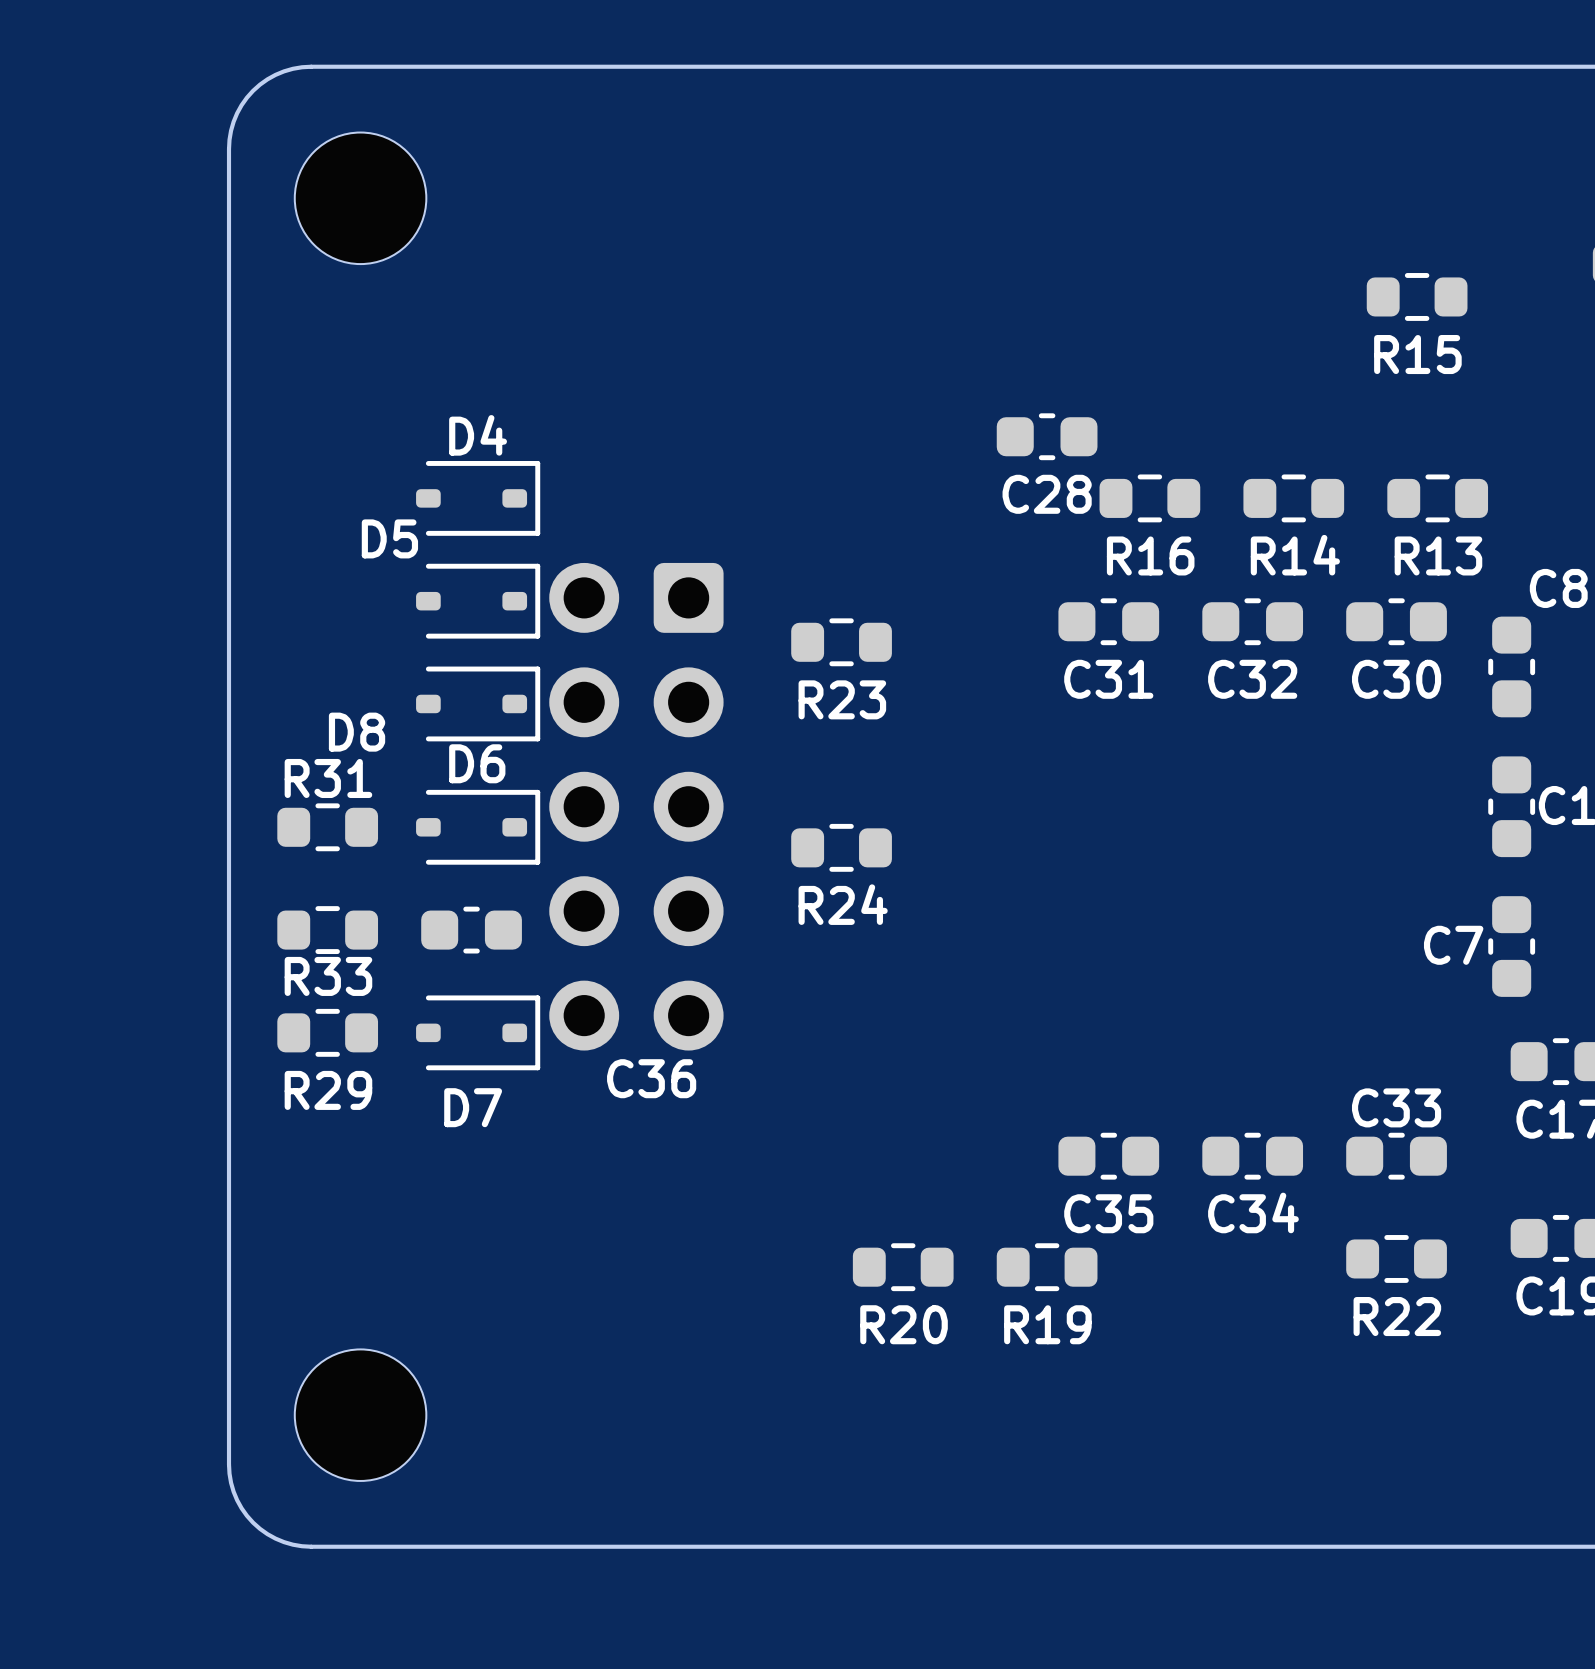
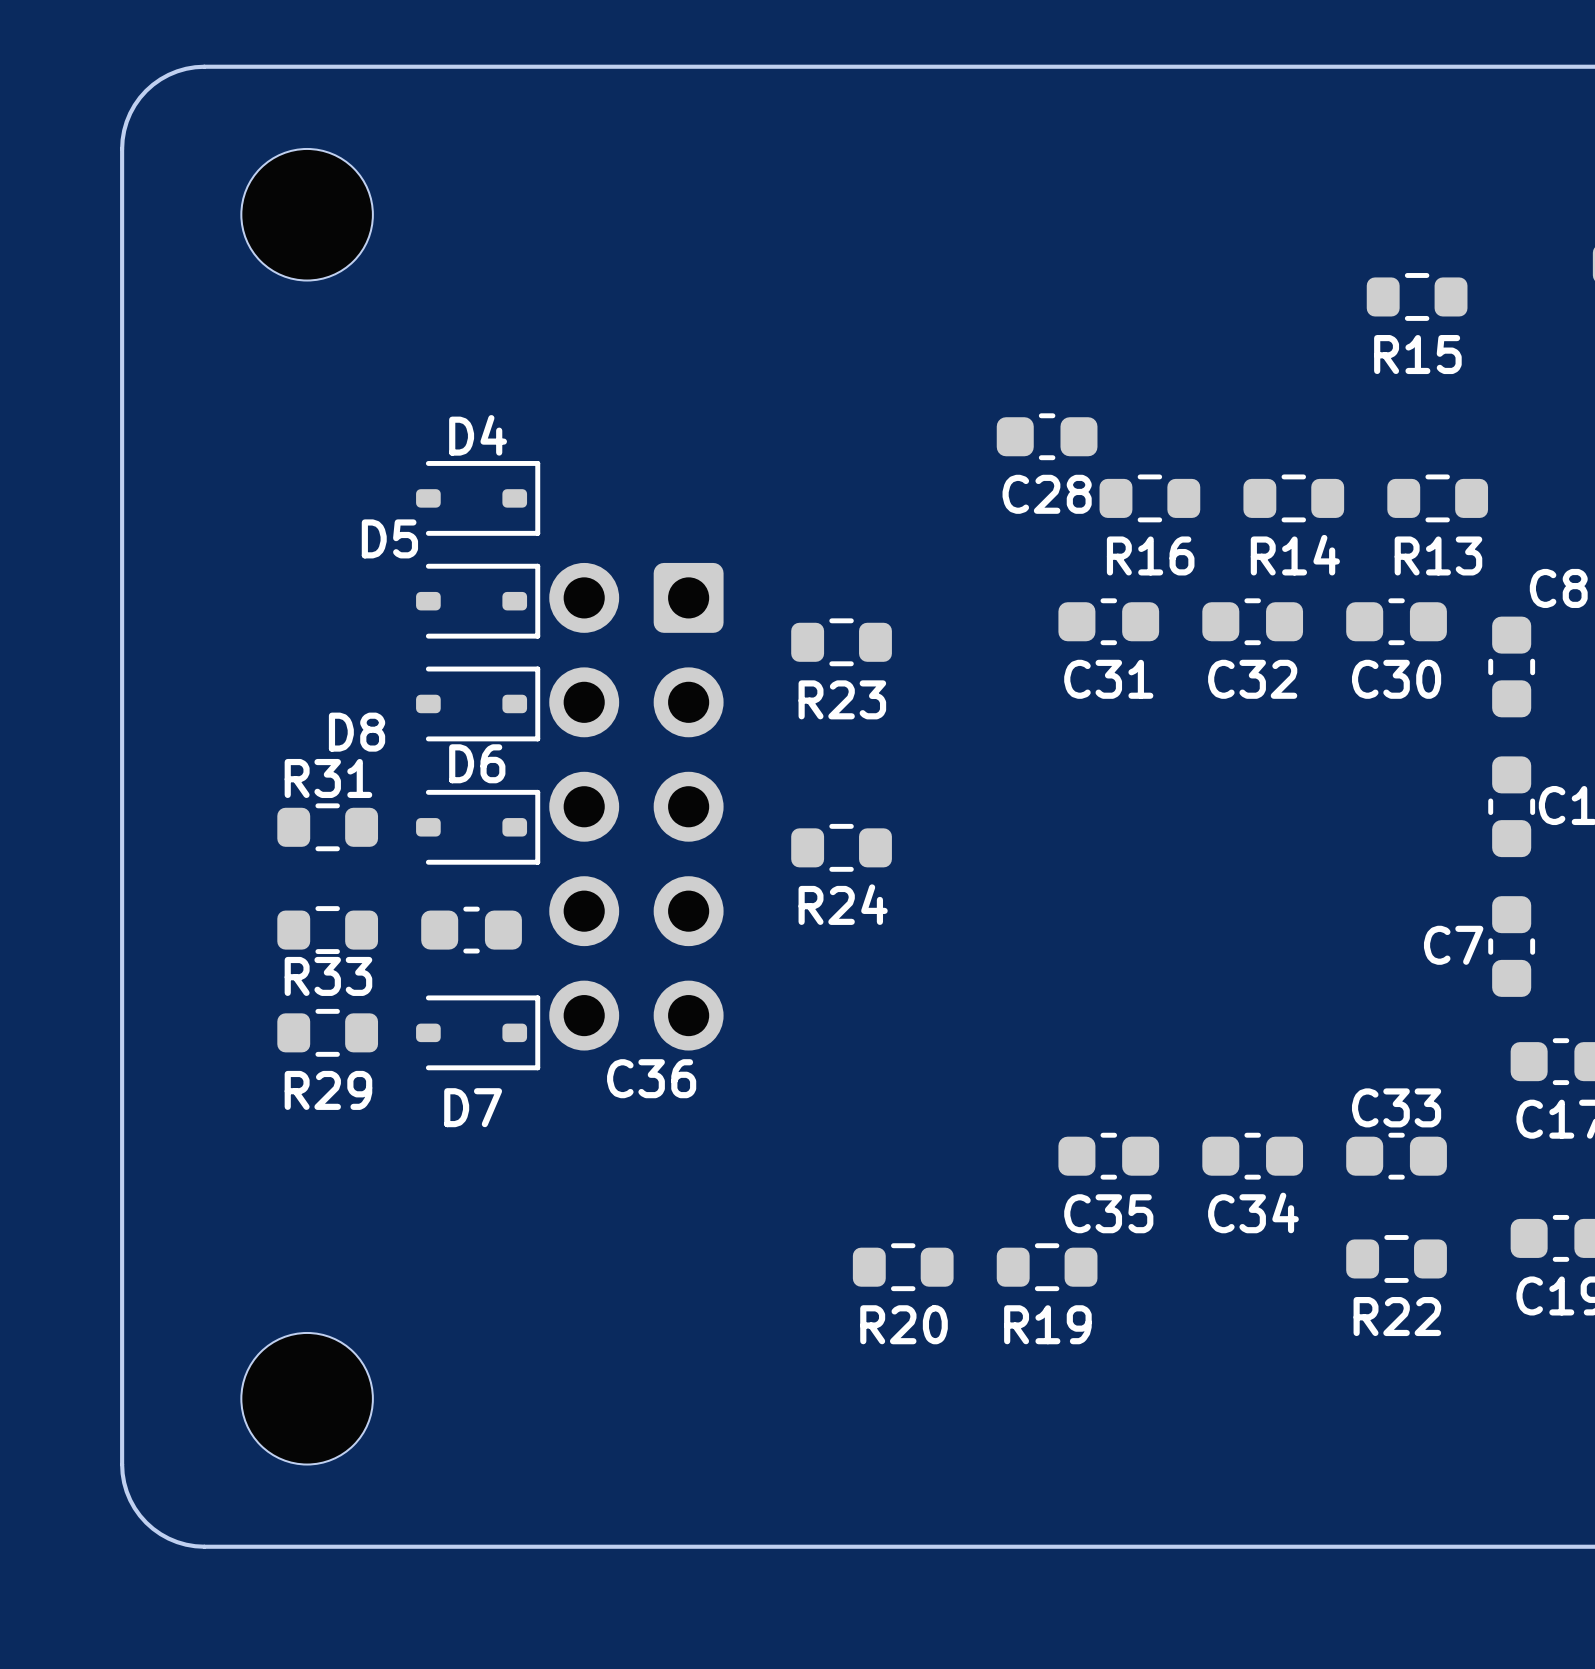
board edge: (311, 66) (284, 71) (267, 79) (253, 90) (237, 113) (231, 130) (229, 148) (229, 1473) (237, 1500) (253, 1522) (275, 1538) (292, 1544) (311, 1546) -> (311, 66) (195, 67) (168, 74) (146, 90) (134, 105) (124, 130) (122, 148) (122, 1473) (126, 1491) (140, 1515) (160, 1534) (177, 1542) (204, 1546) (311, 1546)
part position: (360, 198) -> (307, 214)
part position: (360, 1415) -> (307, 1398)

